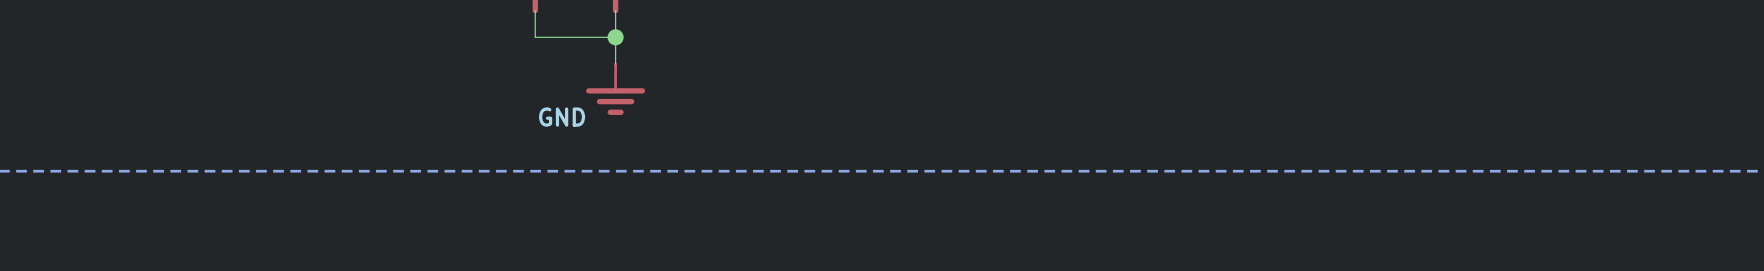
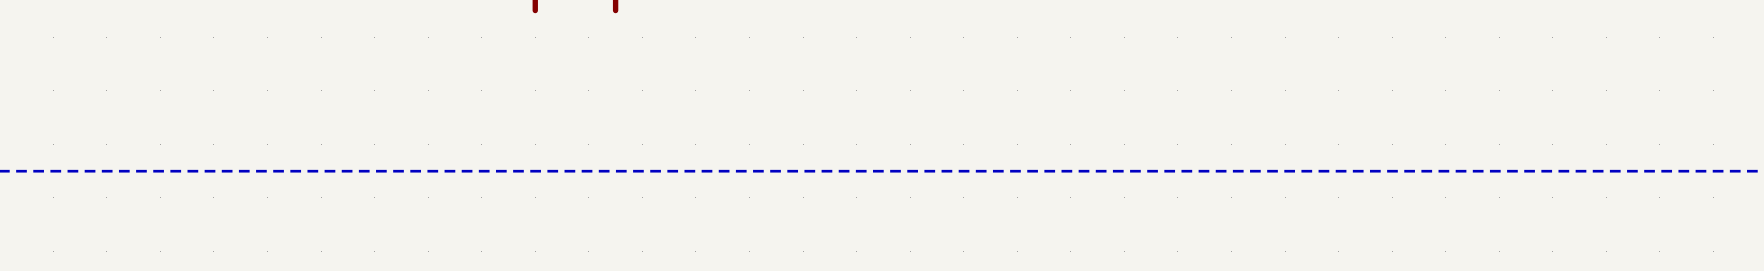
wire: (535, 10) (535, 37) (615, 37) -> none
wire: (615, 10) (615, 64) -> none
junction: (615, 37) -> none
power symbol: GND (615, 88) -> none

